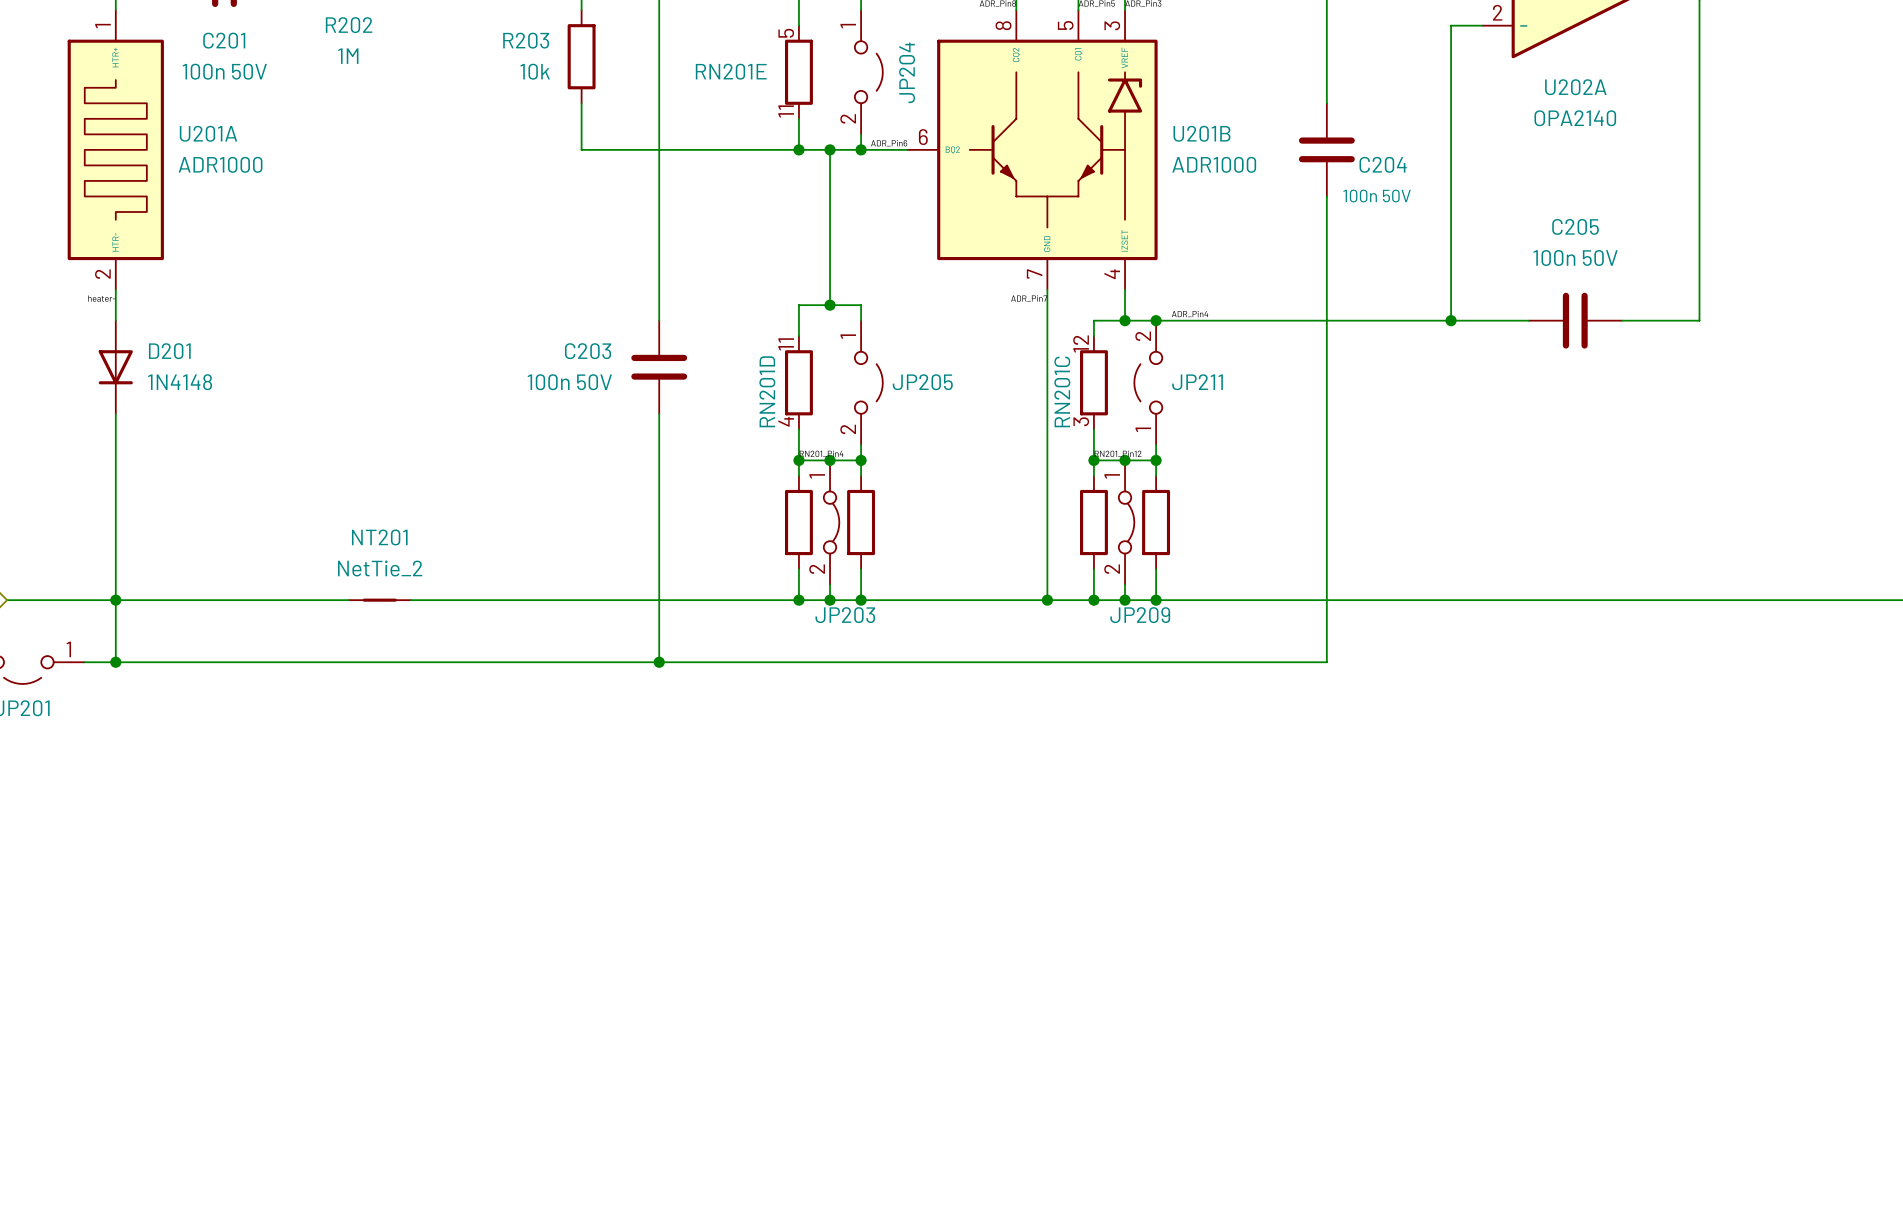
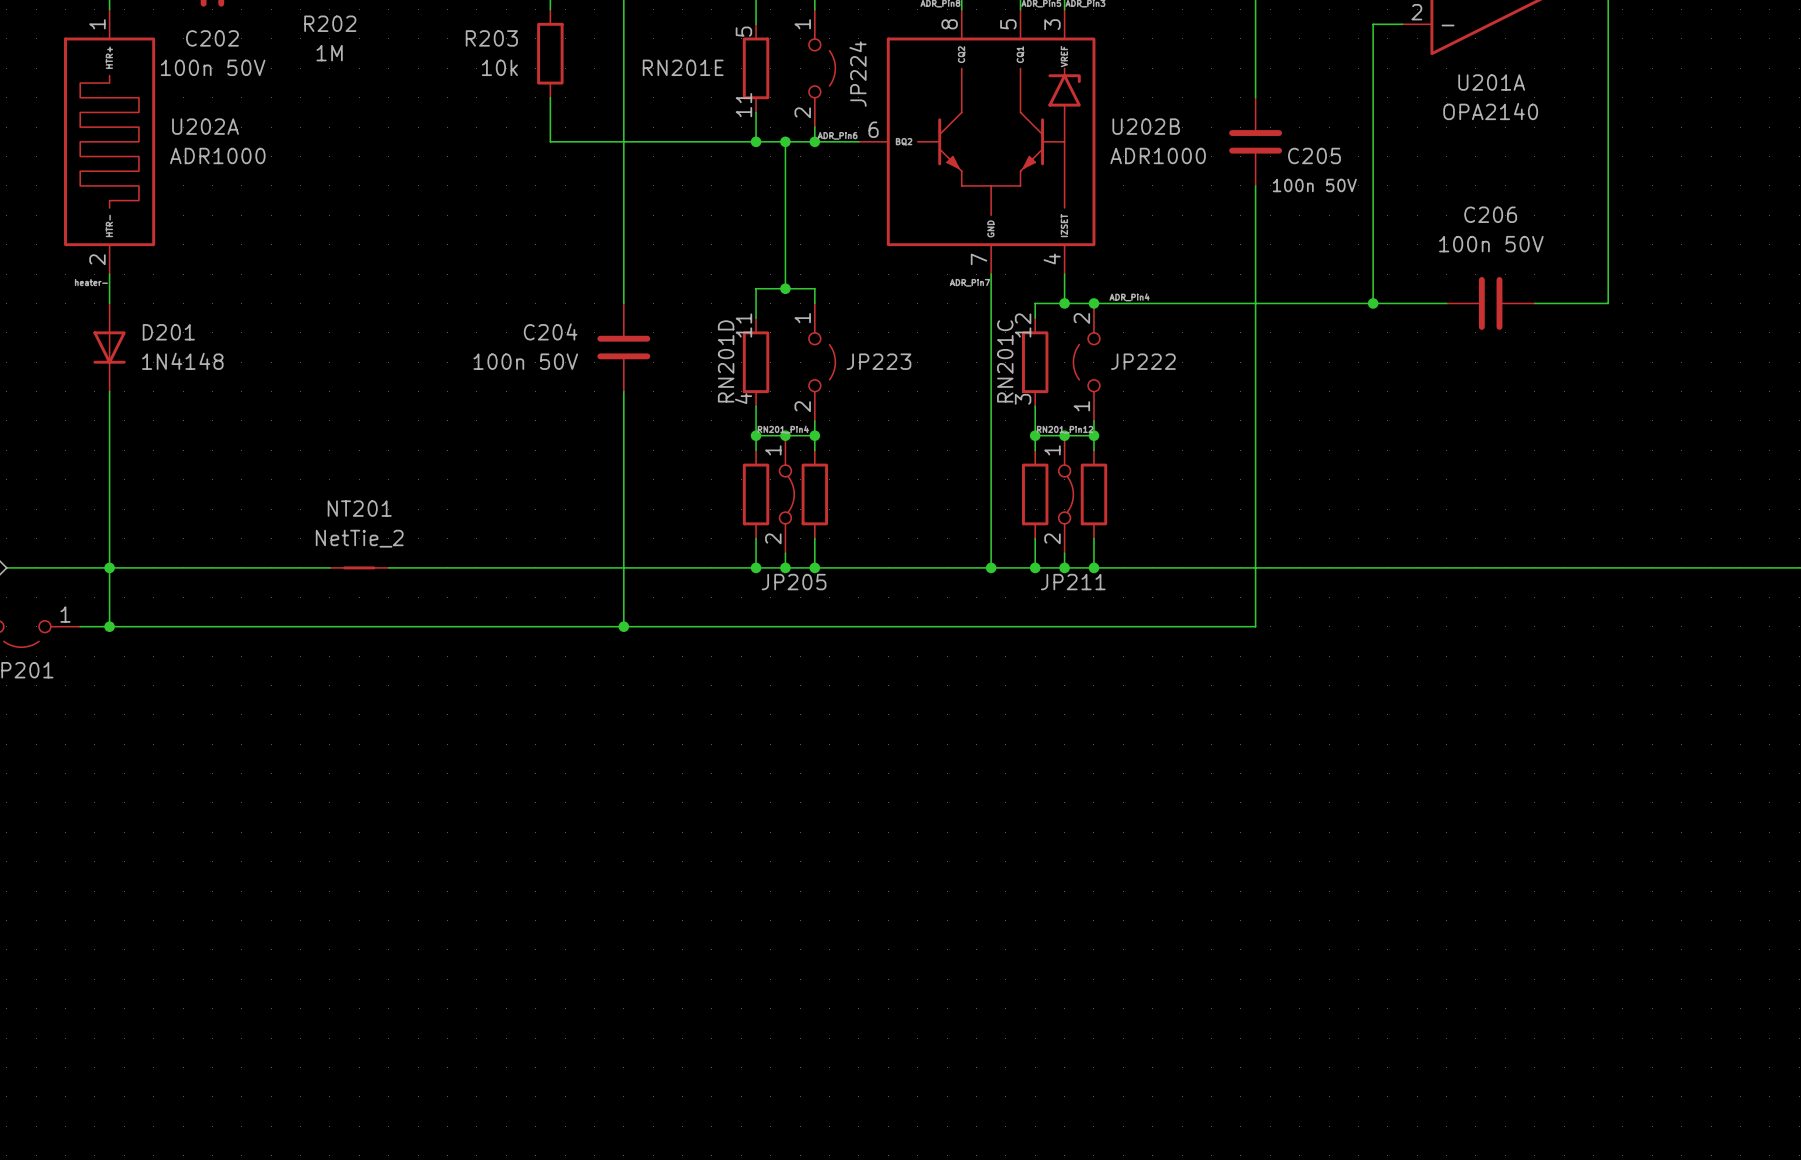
C201 name: C201 (224, 40) -> C202 (212, 38)
JP204 name: JP204 (907, 72) -> JP224 (858, 74)
U202A name: U202A (1575, 87) -> U201A (1491, 82)
U201A name: U201A (208, 133) -> U202A (205, 126)
U201B name: U201B (1201, 133) -> U202B (1146, 126)
C204 name: C204 (1383, 164) -> C205 (1314, 155)
C205 name: C205 (1575, 226) -> C206 (1490, 214)
C203 name: C203 (588, 351) -> C204 (550, 331)
JP205 name: JP205 (922, 382) -> JP223 (878, 361)
JP211 name: JP211 (1197, 382) -> JP222 (1143, 361)
JP203 name: JP203 (845, 615) -> JP205 (794, 582)
JP209 name: JP209 (1140, 615) -> JP211 (1073, 582)

